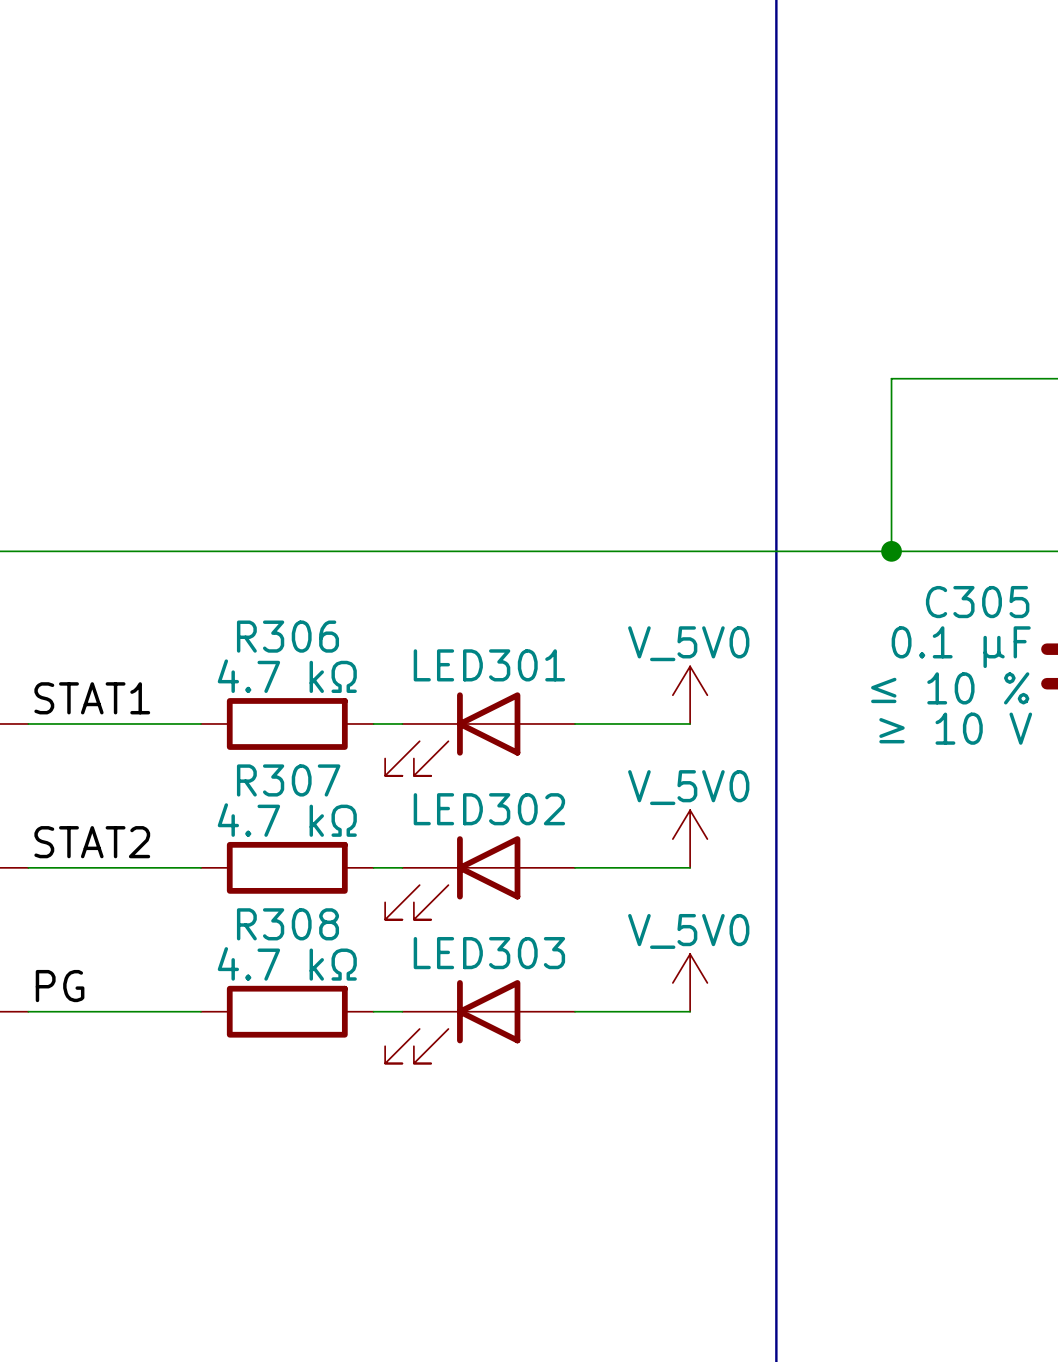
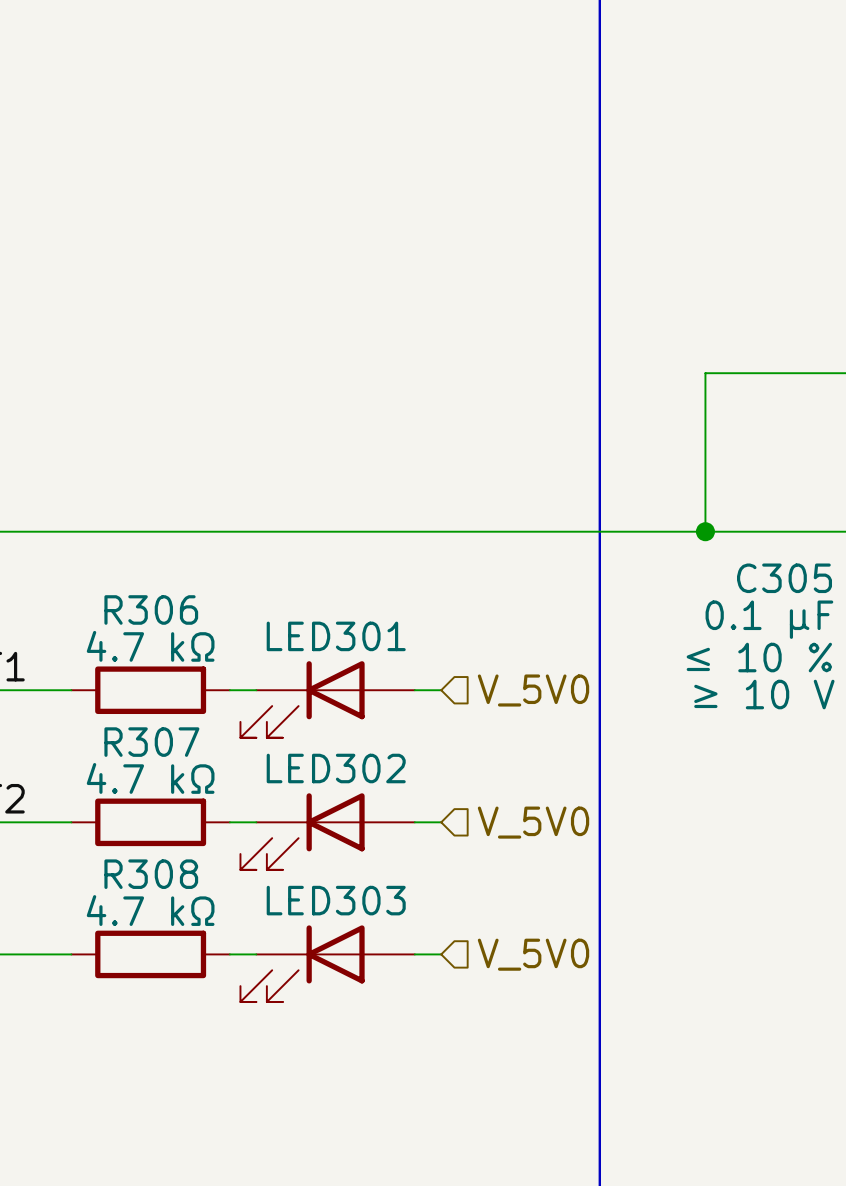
power symbol: V_5V0 (690, 695) -> none
wire: (603, 723) (690, 723) -> none
hierarchical label: none -> V_5V0 (533, 690)
power symbol: V_5V0 (690, 839) -> none
wire: (603, 867) (690, 867) -> none
hierarchical label: none -> V_5V0 (533, 822)
power symbol: V_5V0 (690, 982) -> none
wire: (603, 1011) (690, 1011) -> none
hierarchical label: none -> V_5V0 (533, 954)

